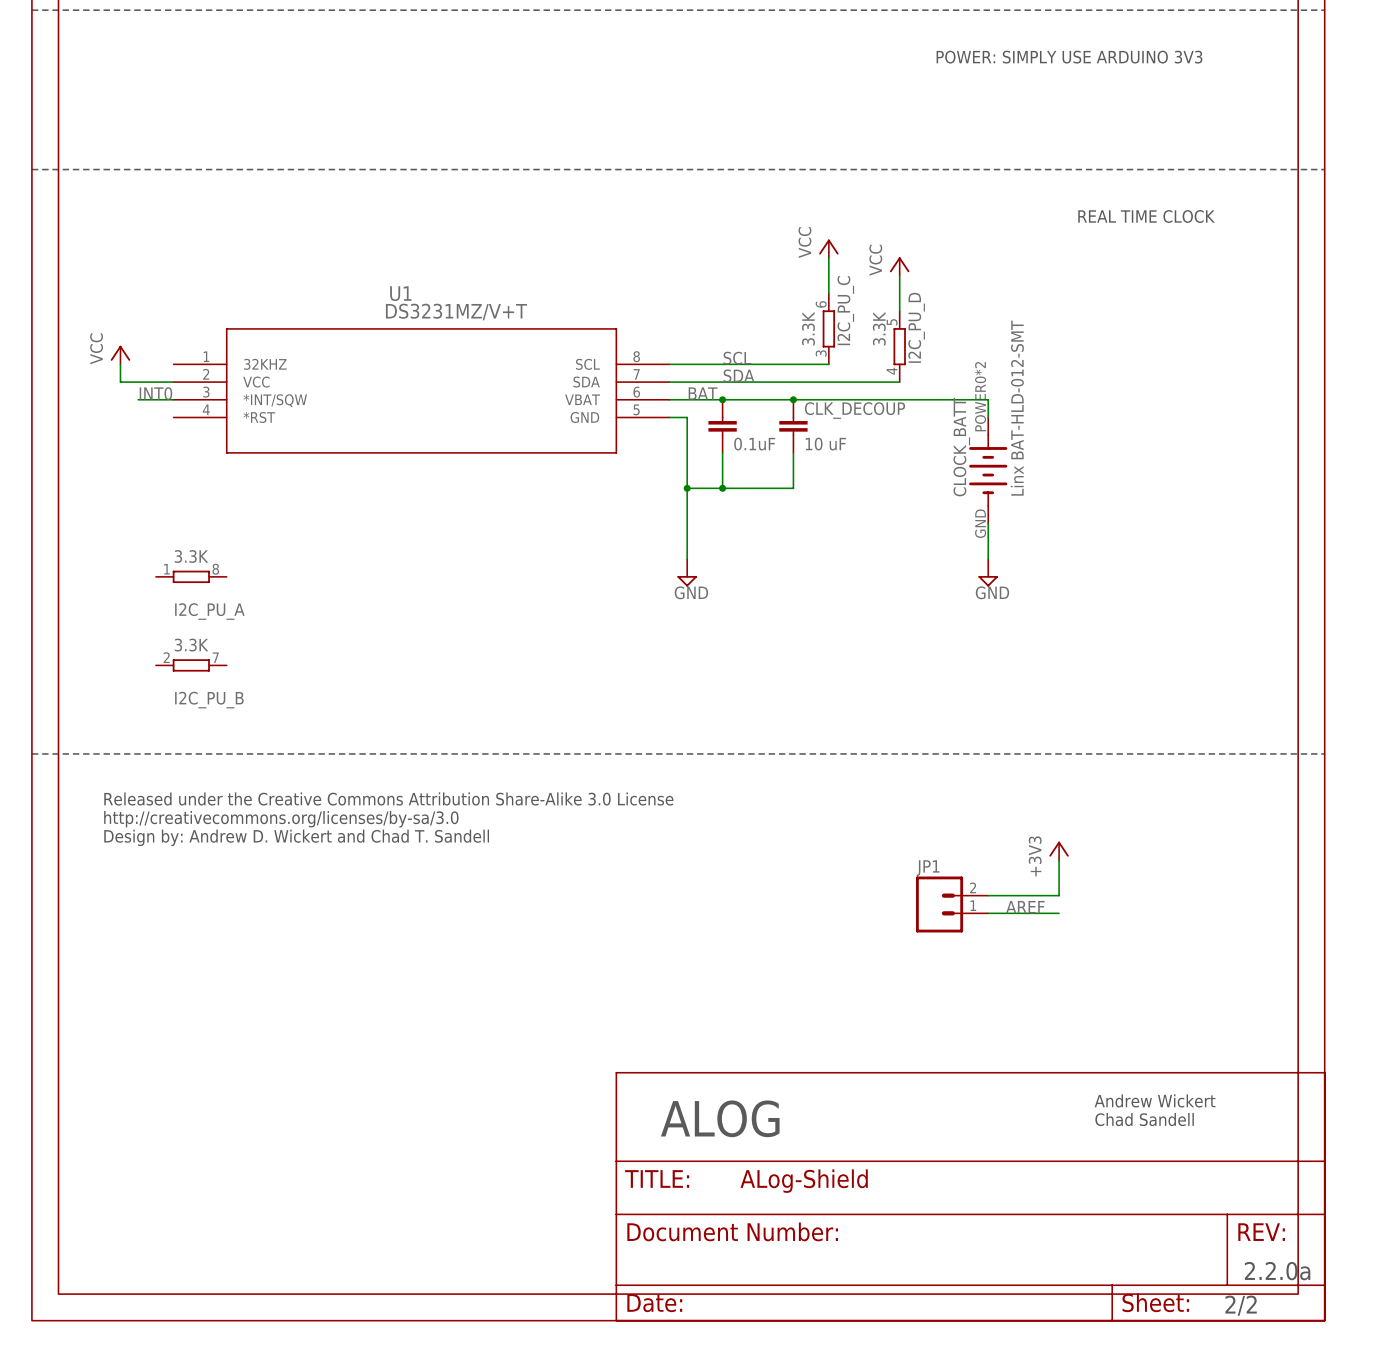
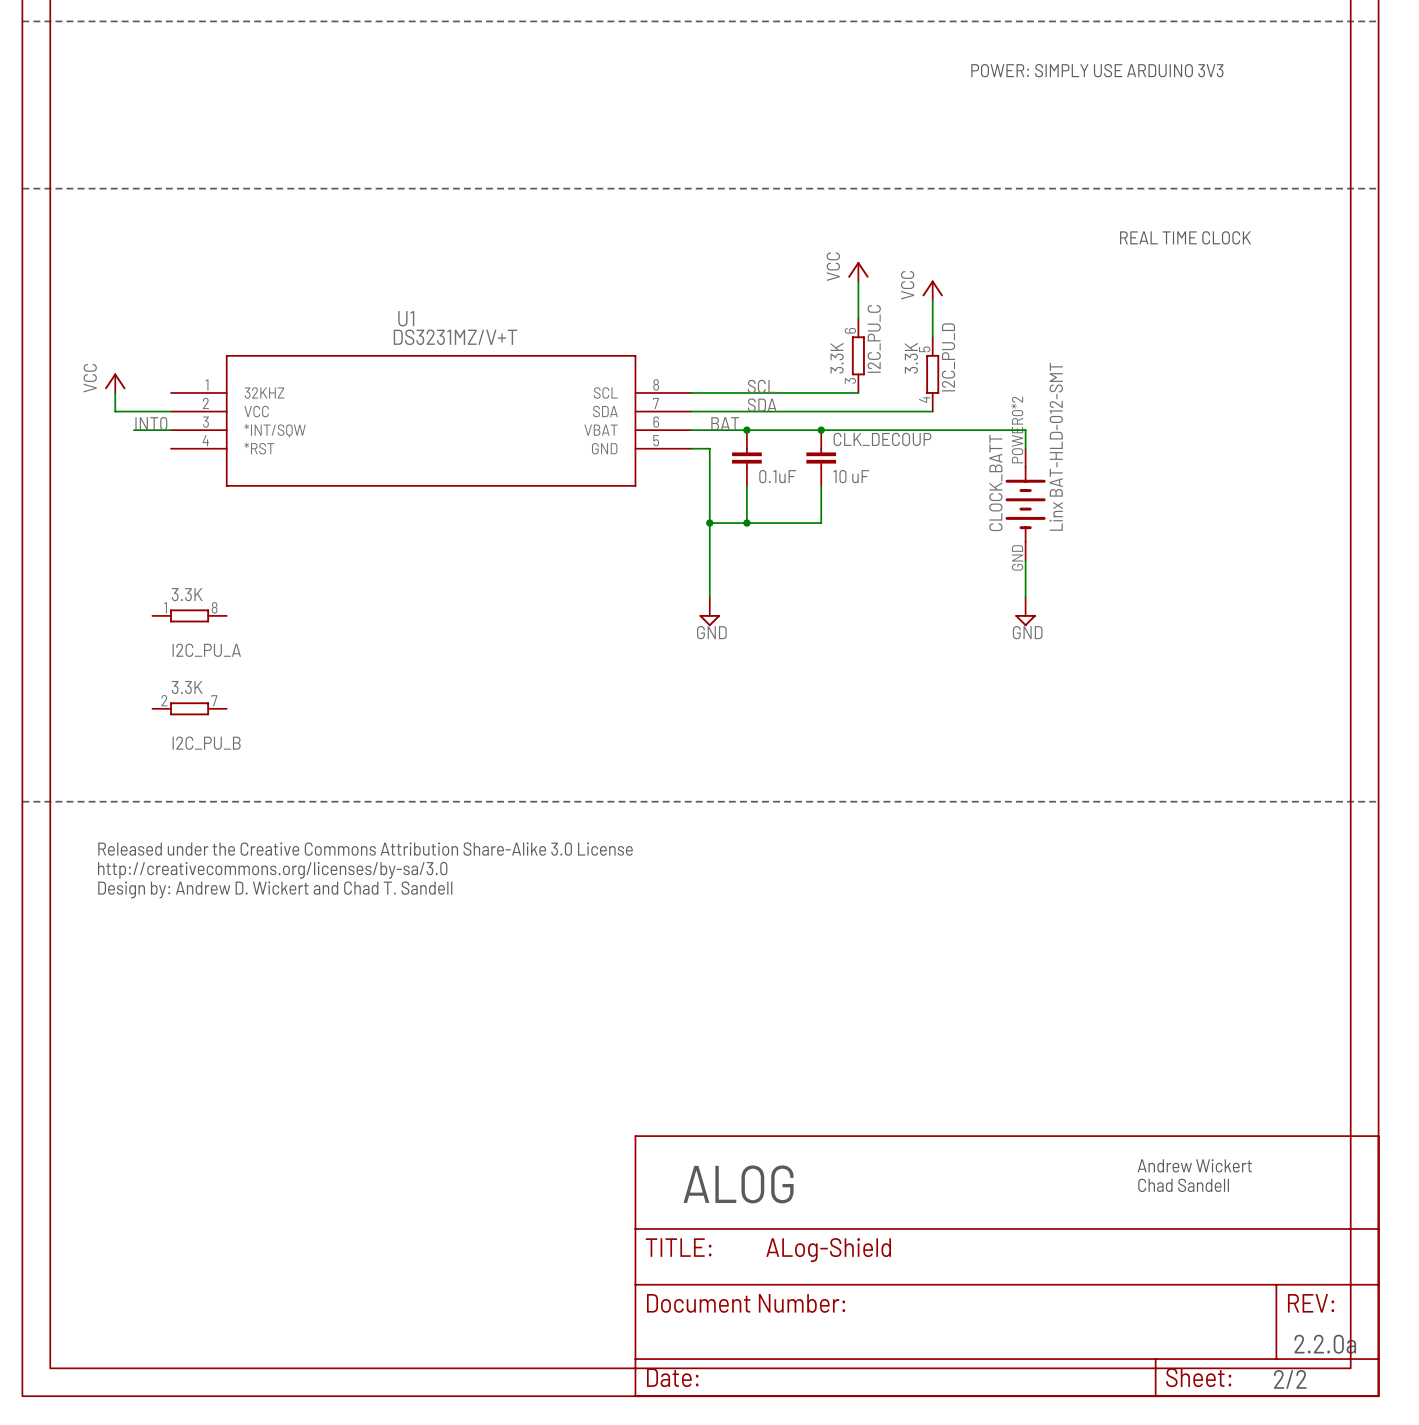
power symbol: +3V3 (1059, 850) -> none
wire: (1059, 860) (1059, 895) (988, 895) -> none
JP1: (952, 904) -> none
label: AREF (1025, 907) -> none
wire: (988, 913) (1059, 913) -> none

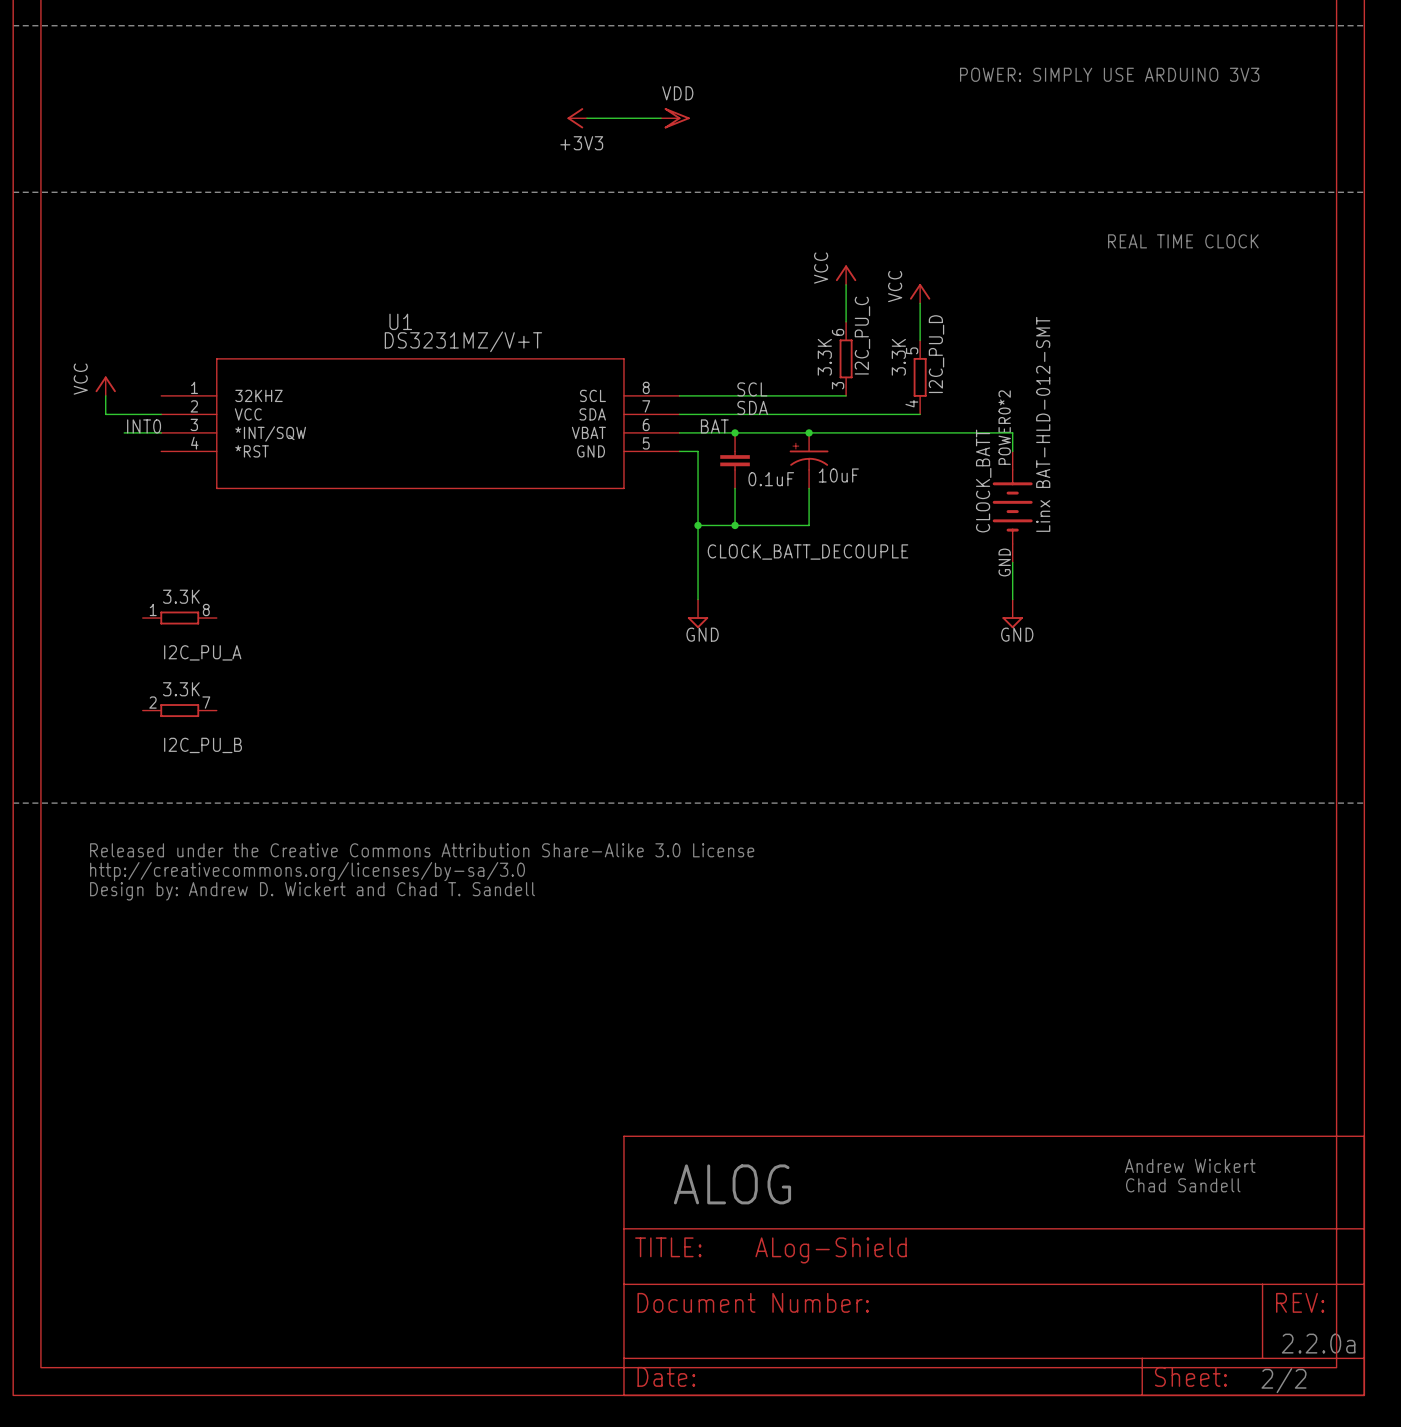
power symbol: none -> +3V3 (577, 118)
wire: none -> (586, 118) (661, 118)
power symbol: none -> VDD (675, 118)
CLK_DECOUP: 10 uF (821, 458) -> none
CLOCK_BATT_DECOUPLE: none -> 10uF (809, 460)

